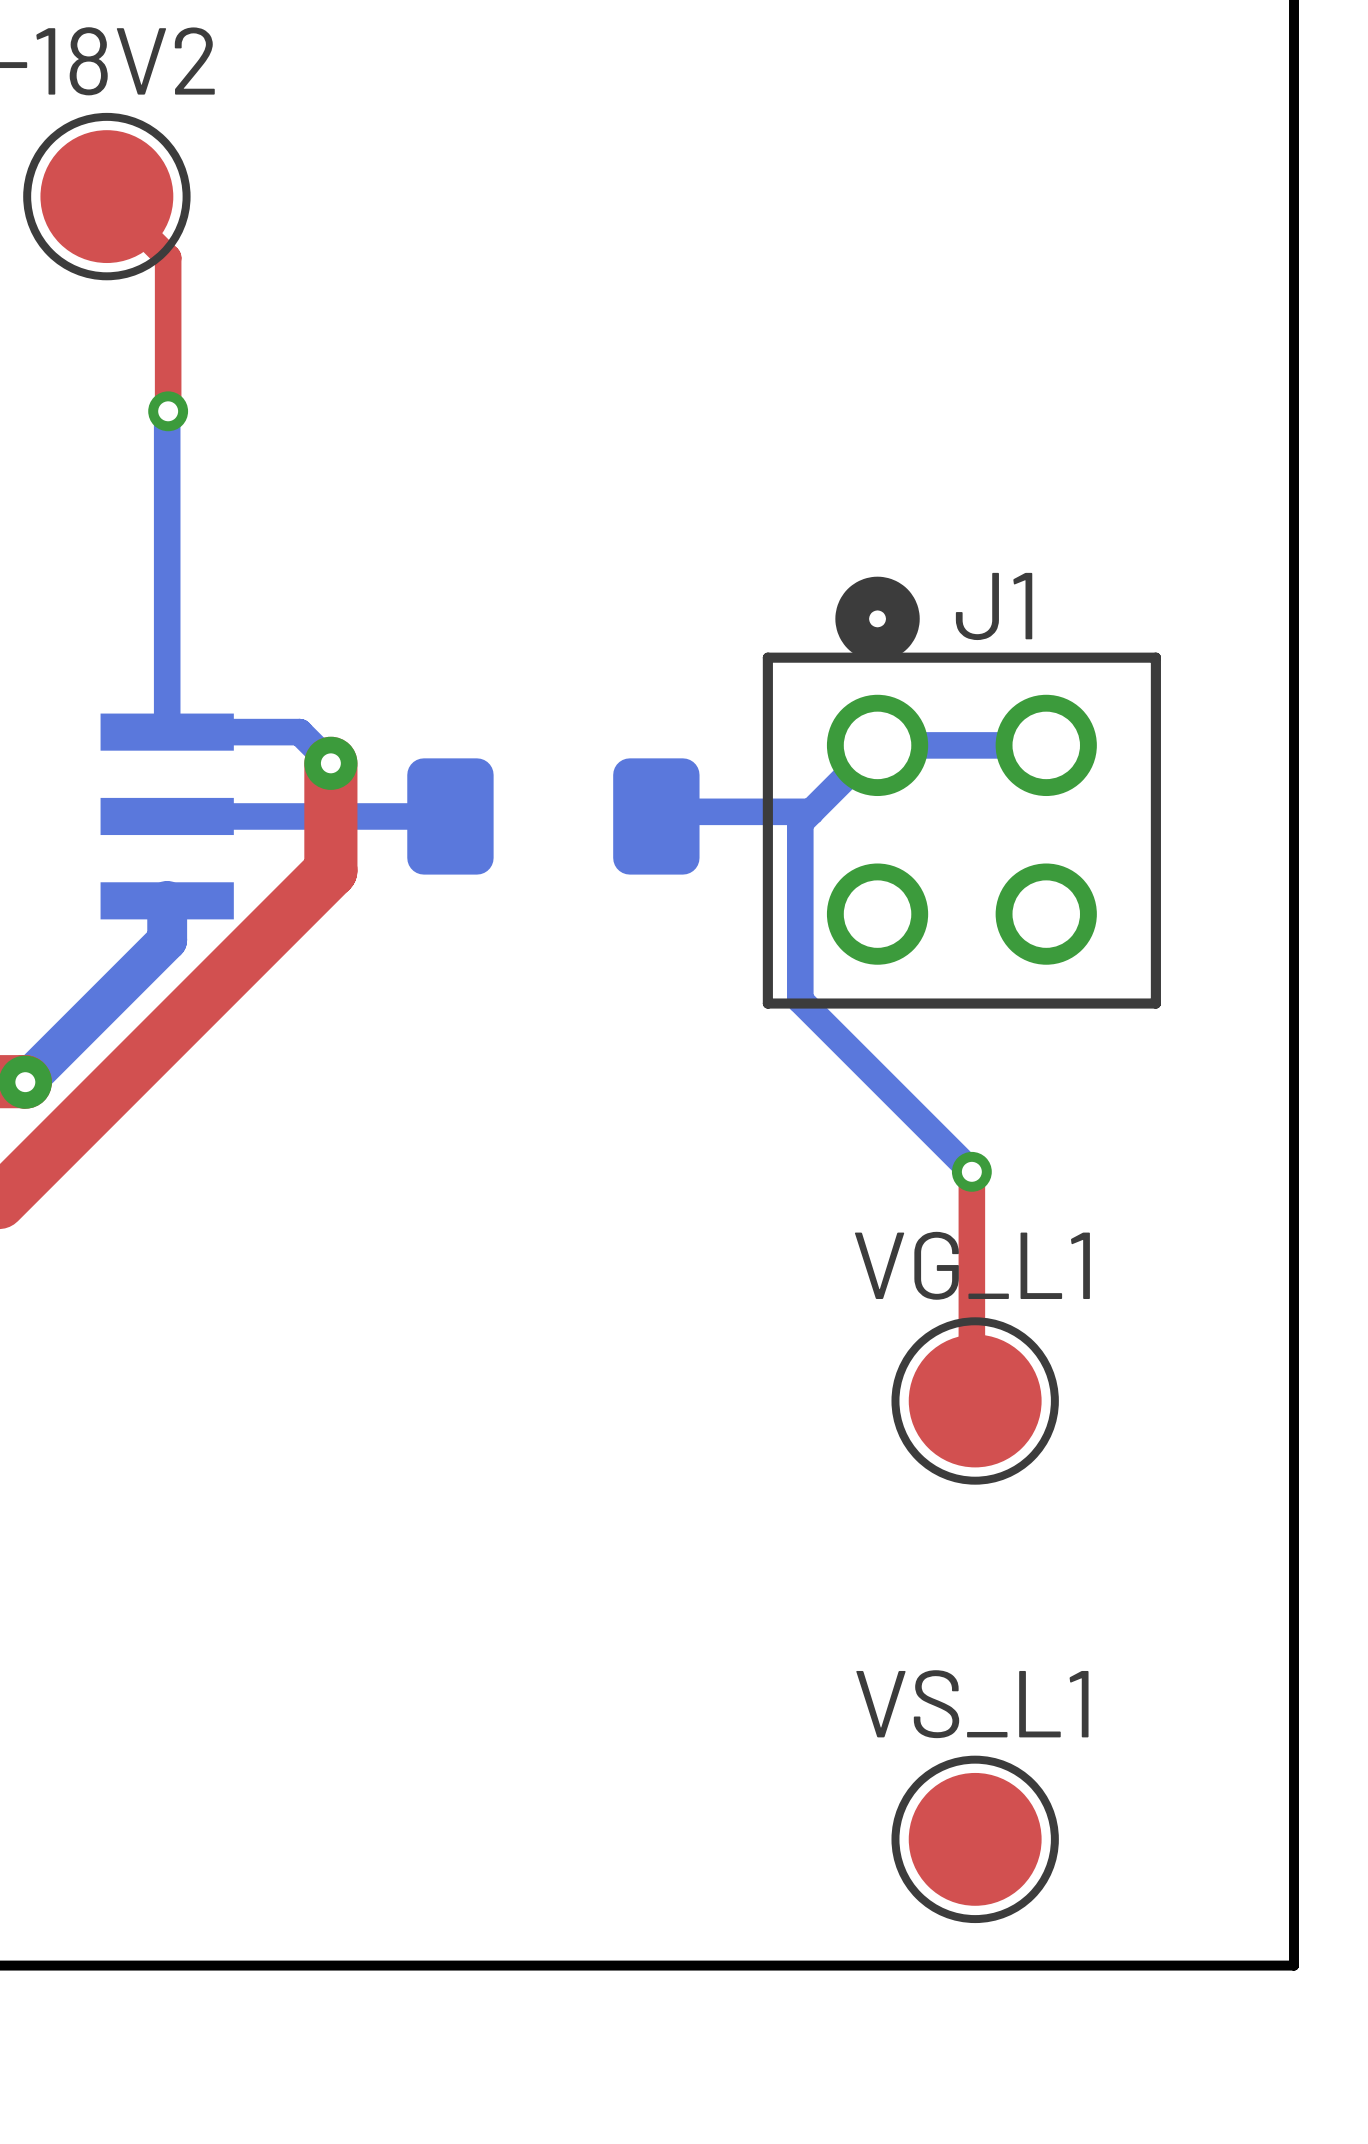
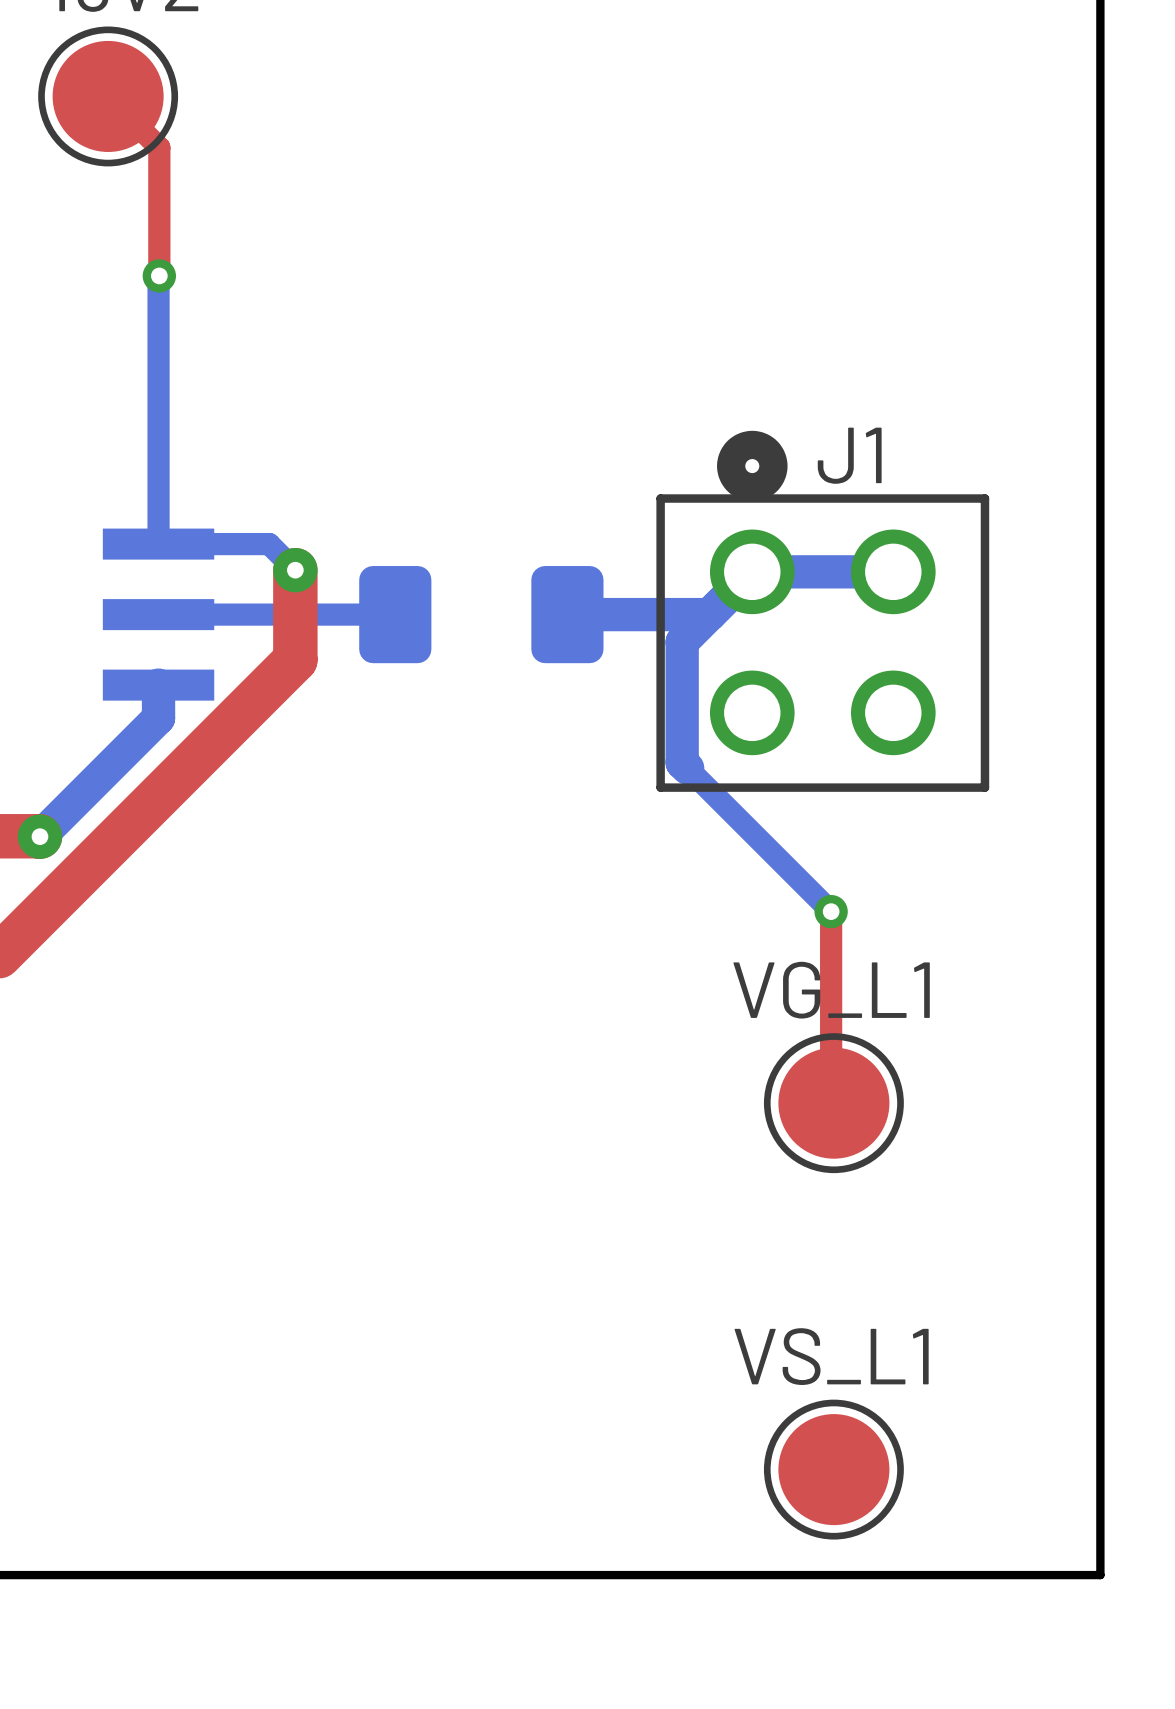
bottom track: (1046, 745) (877, 745) (800, 822) (800, 1000) -> (893, 571) (752, 571) (682, 641) (682, 762) (687, 768)
J1 position: (961, 792) -> (822, 611)
bottom track: (811, 811) (661, 811) (656, 816) -> (709, 614) (567, 614)

